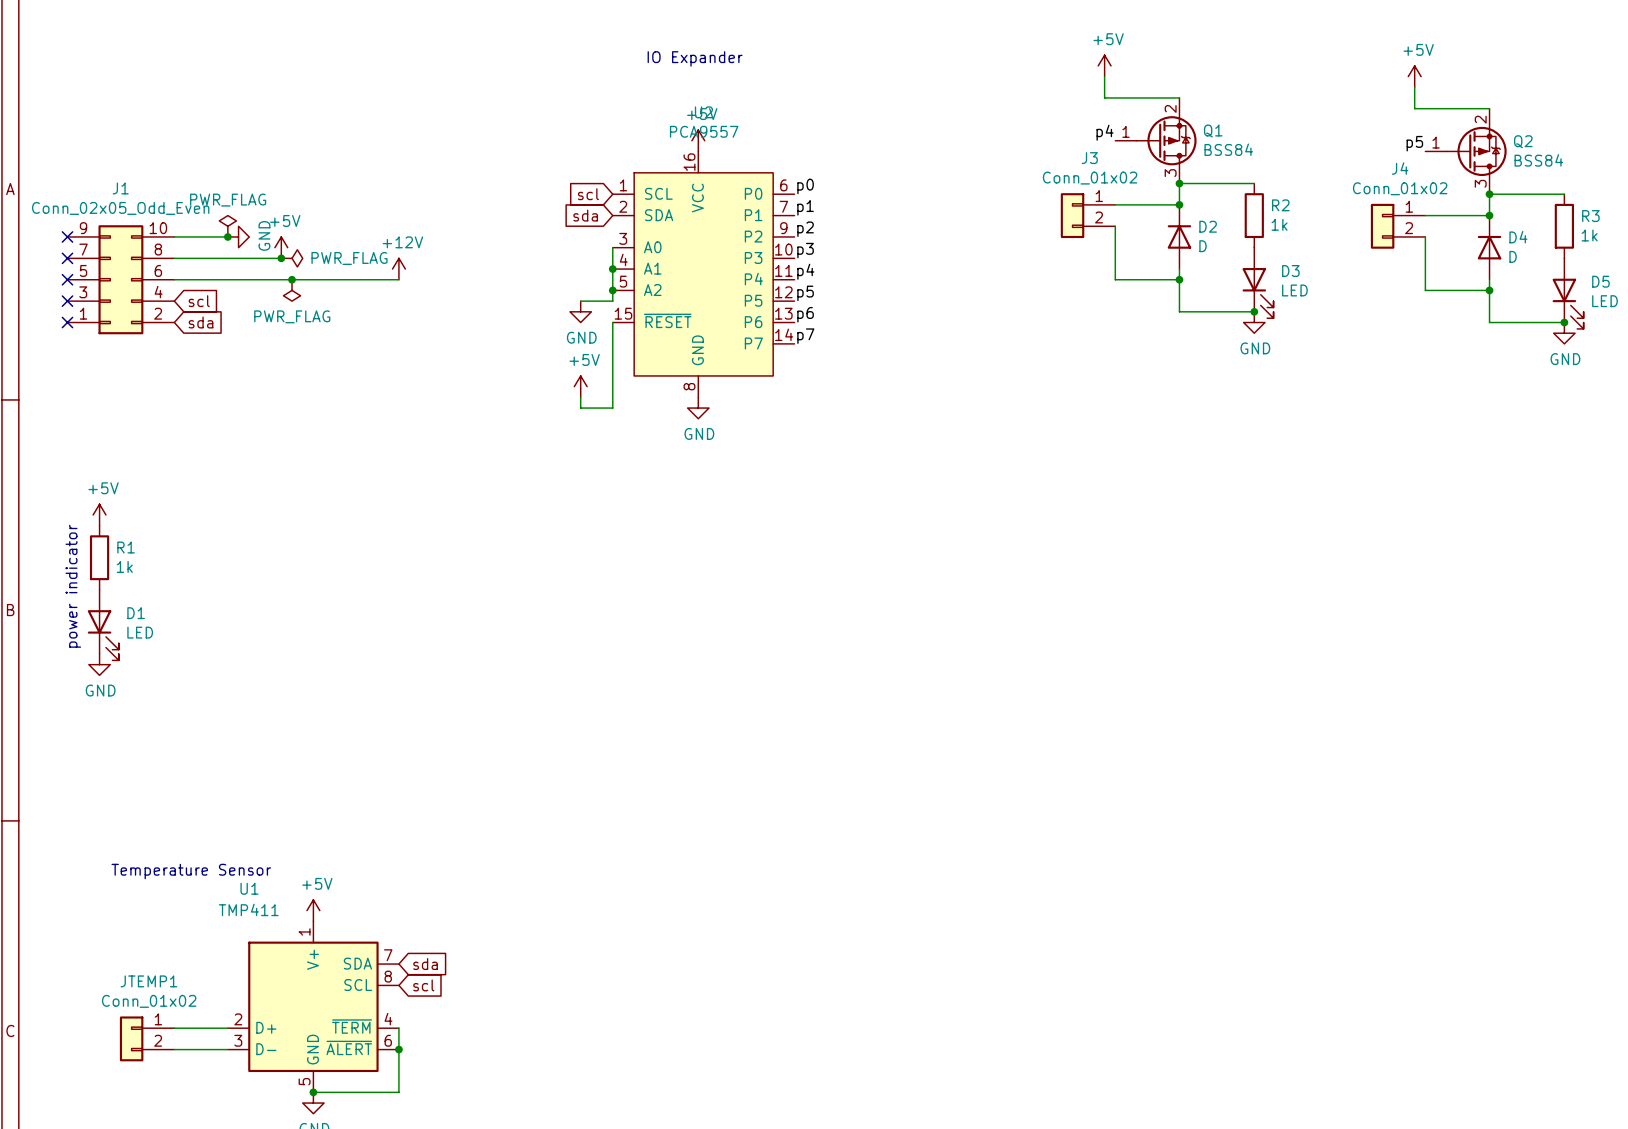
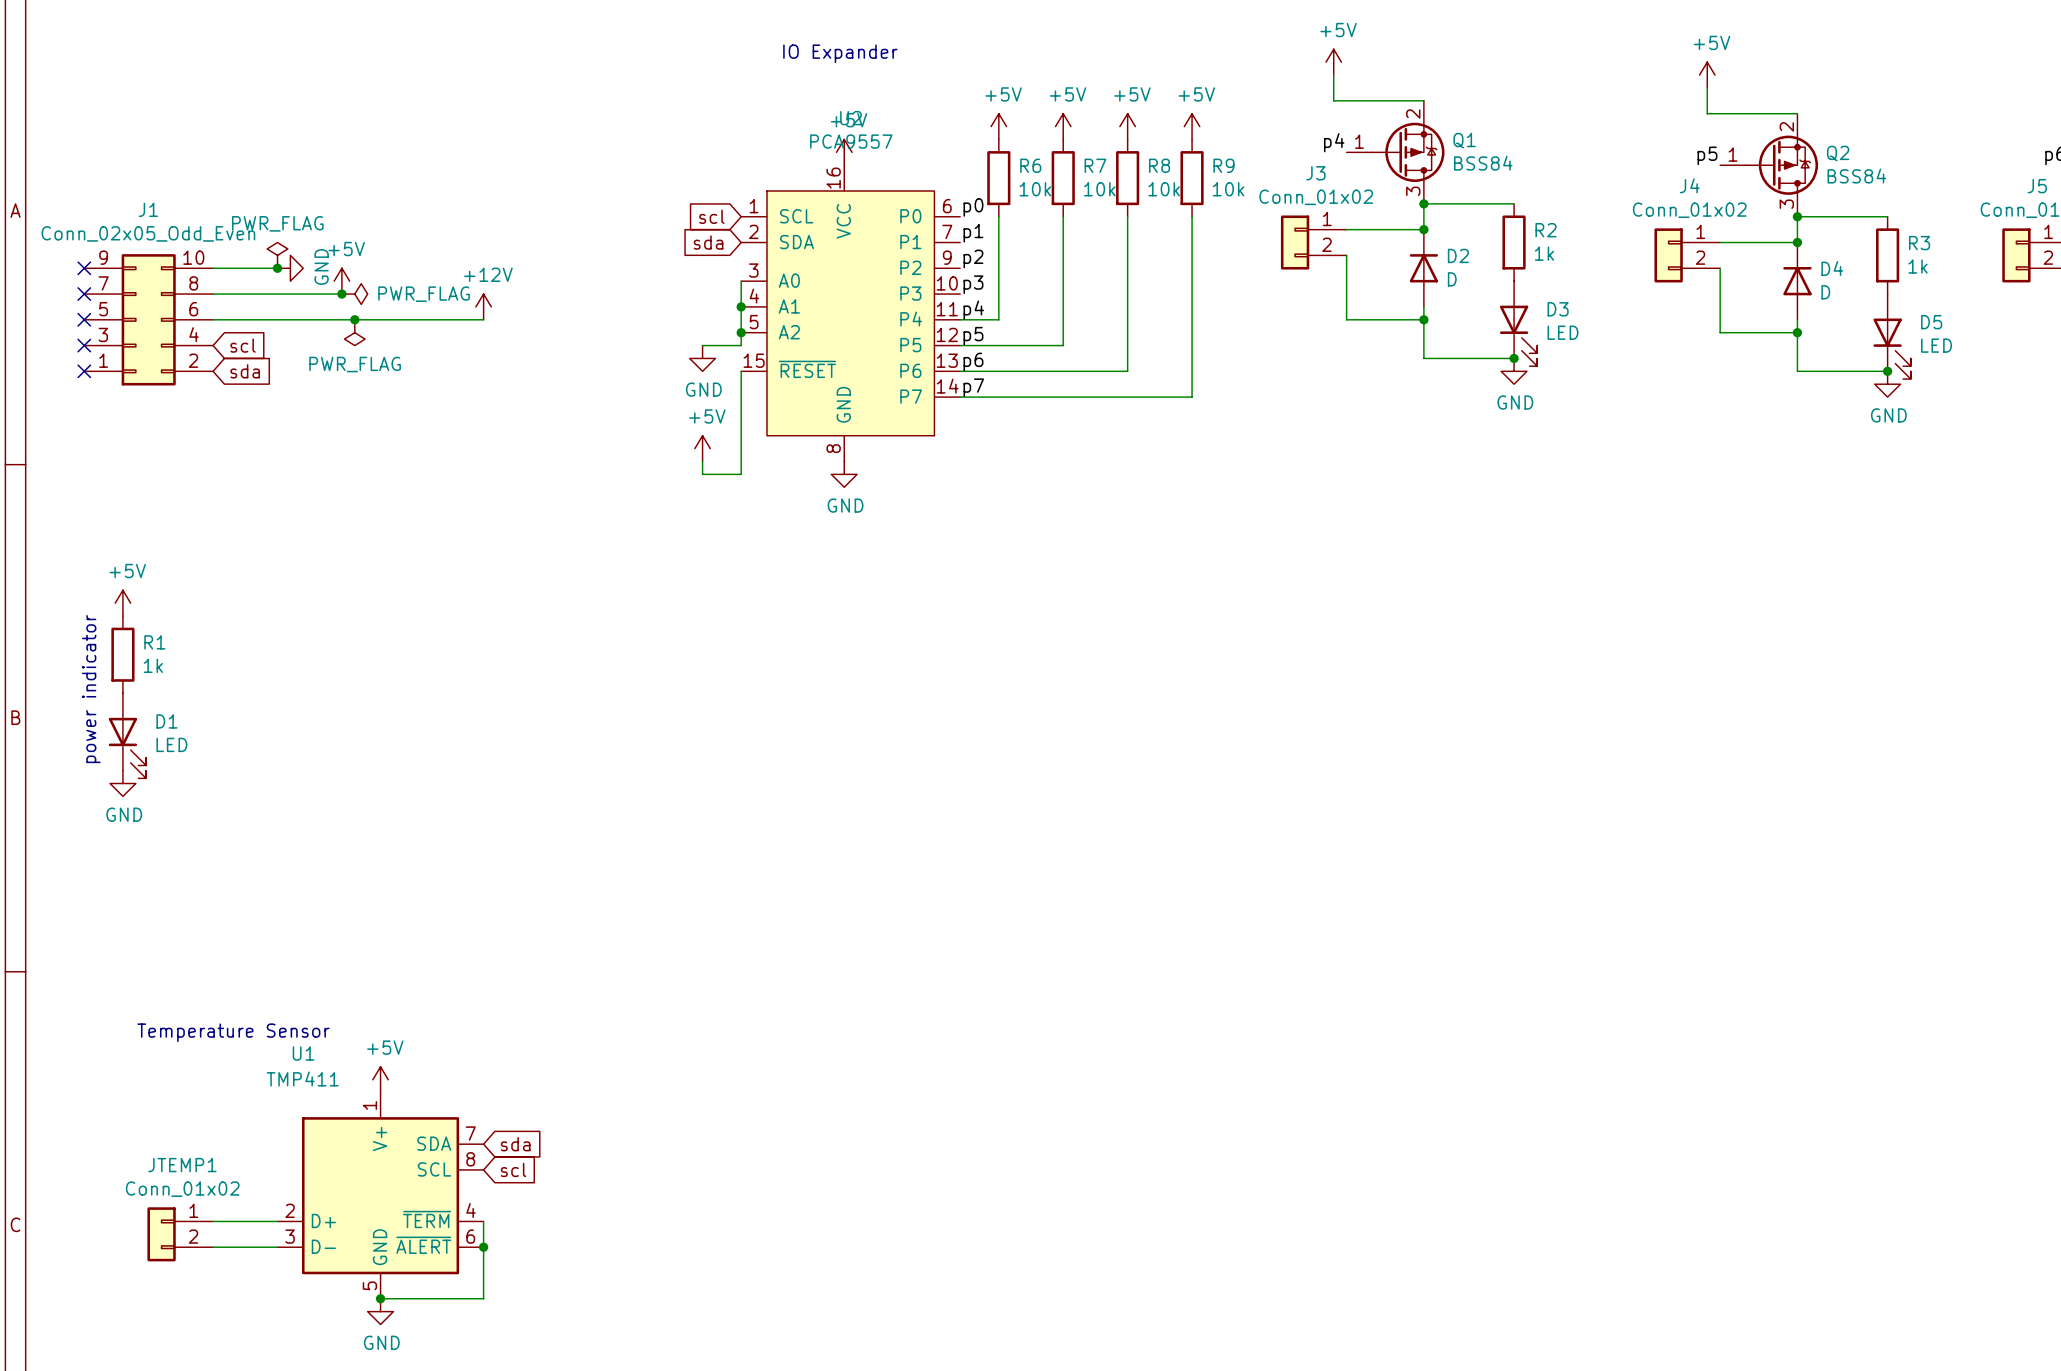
power symbol: none -> +5V (998, 126)
power symbol: none -> +5V (1063, 126)
power symbol: none -> +5V (1127, 126)
power symbol: none -> +5V (1192, 126)
R6: none -> 10k (998, 178)
R7: none -> 10k (1063, 178)
R8: none -> 10k (1127, 178)
R9: none -> 10k (1192, 178)
wire: none -> (998, 216) (998, 319) (960, 319)
wire: none -> (1063, 216) (1063, 345) (960, 345)
wire: none -> (1127, 216) (1127, 371) (960, 371)
wire: none -> (1192, 216) (1192, 397) (960, 397)

